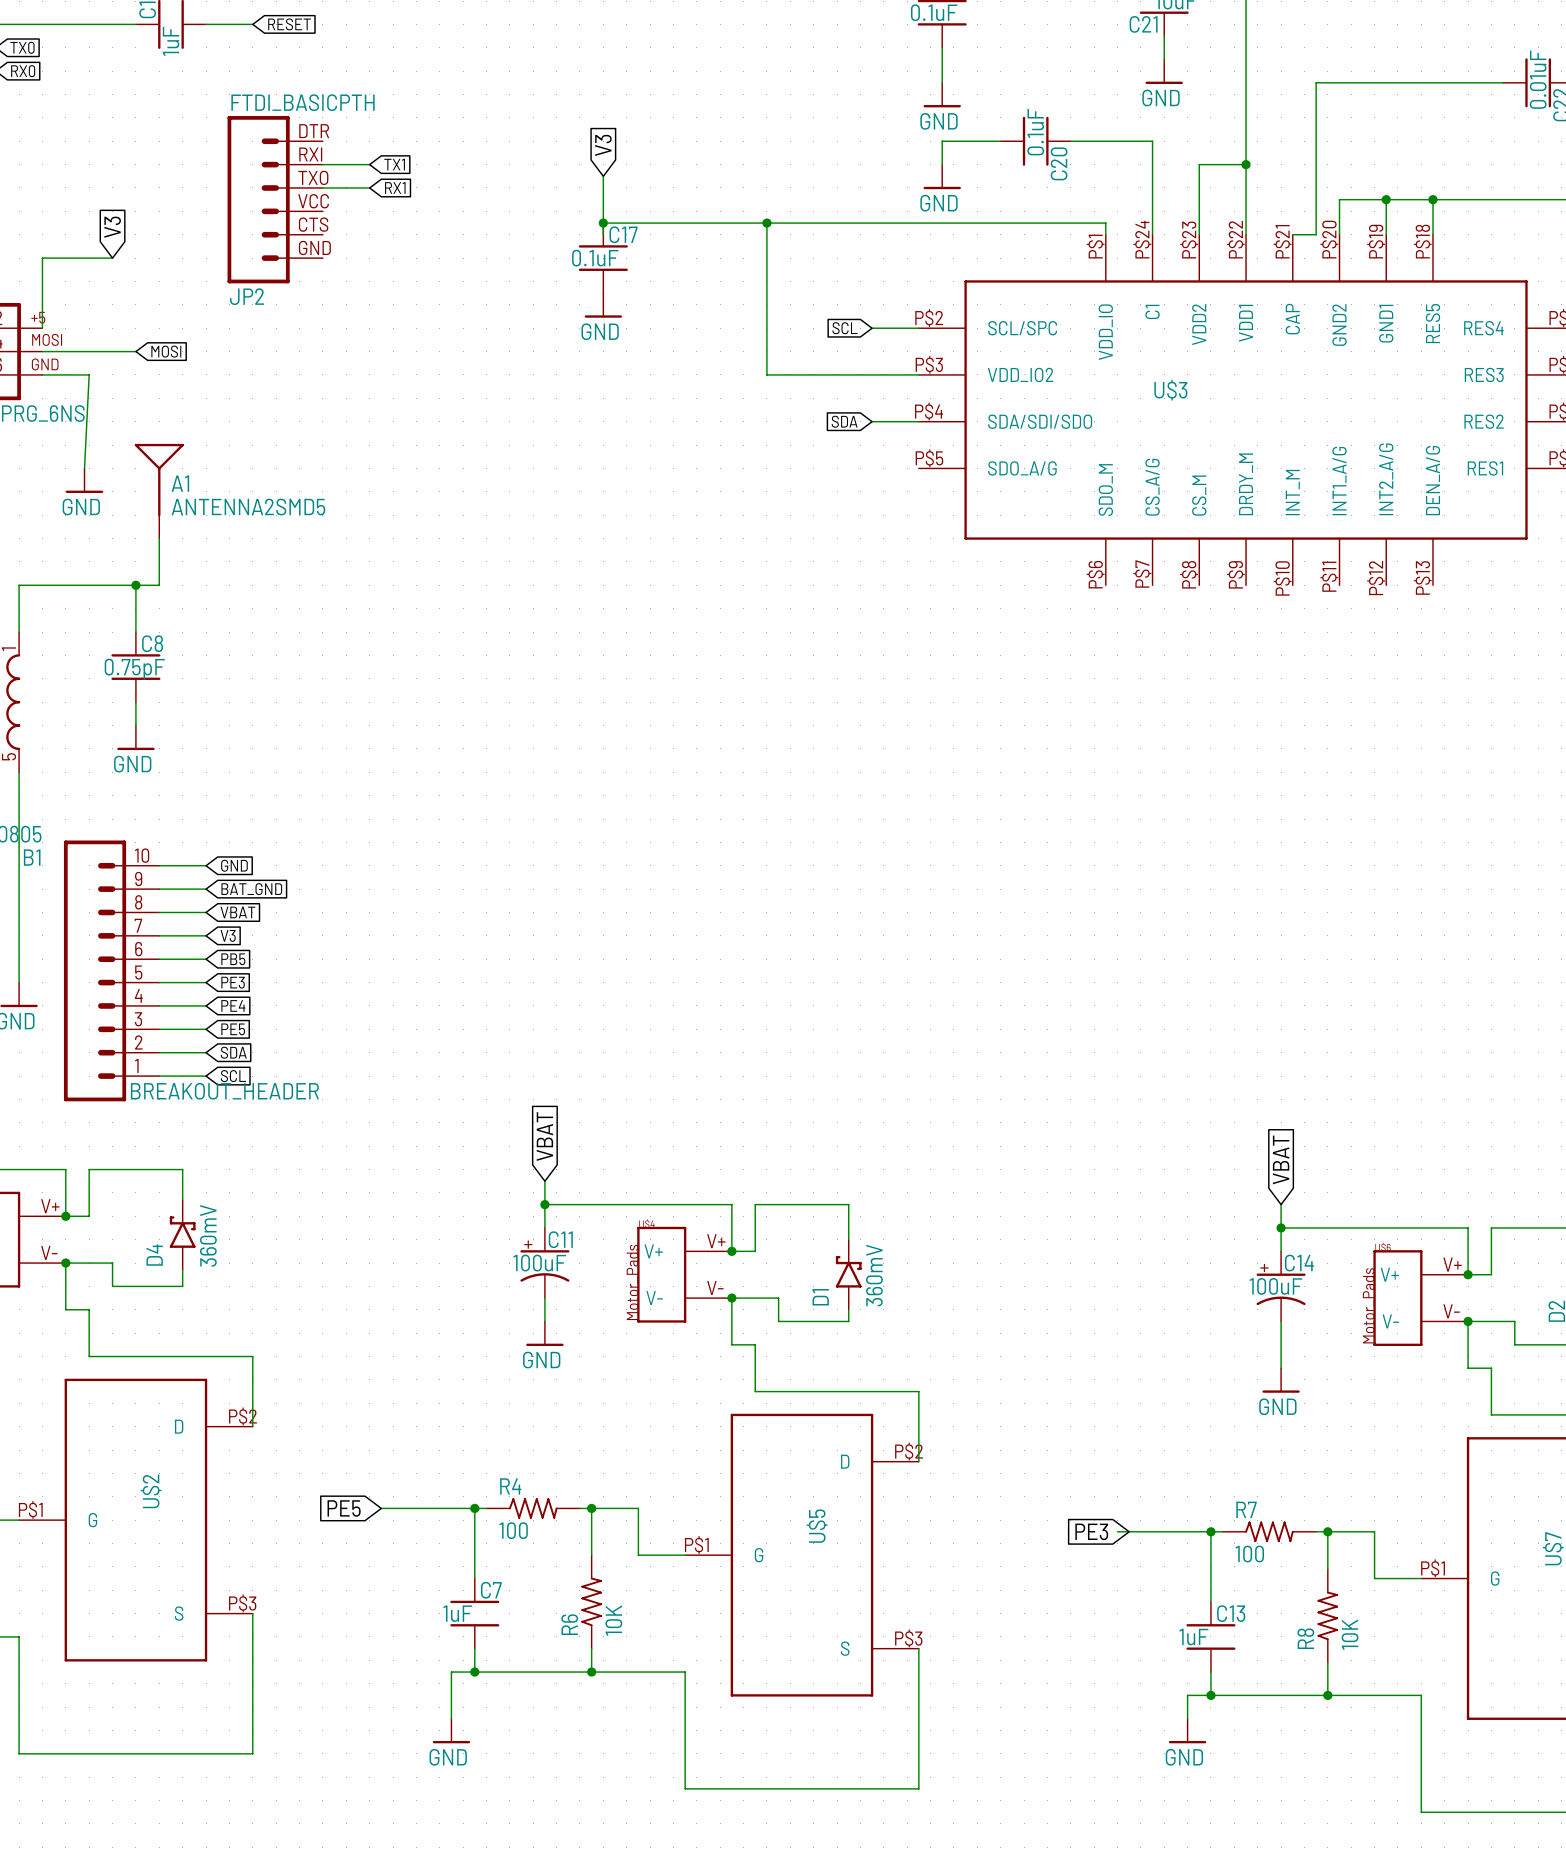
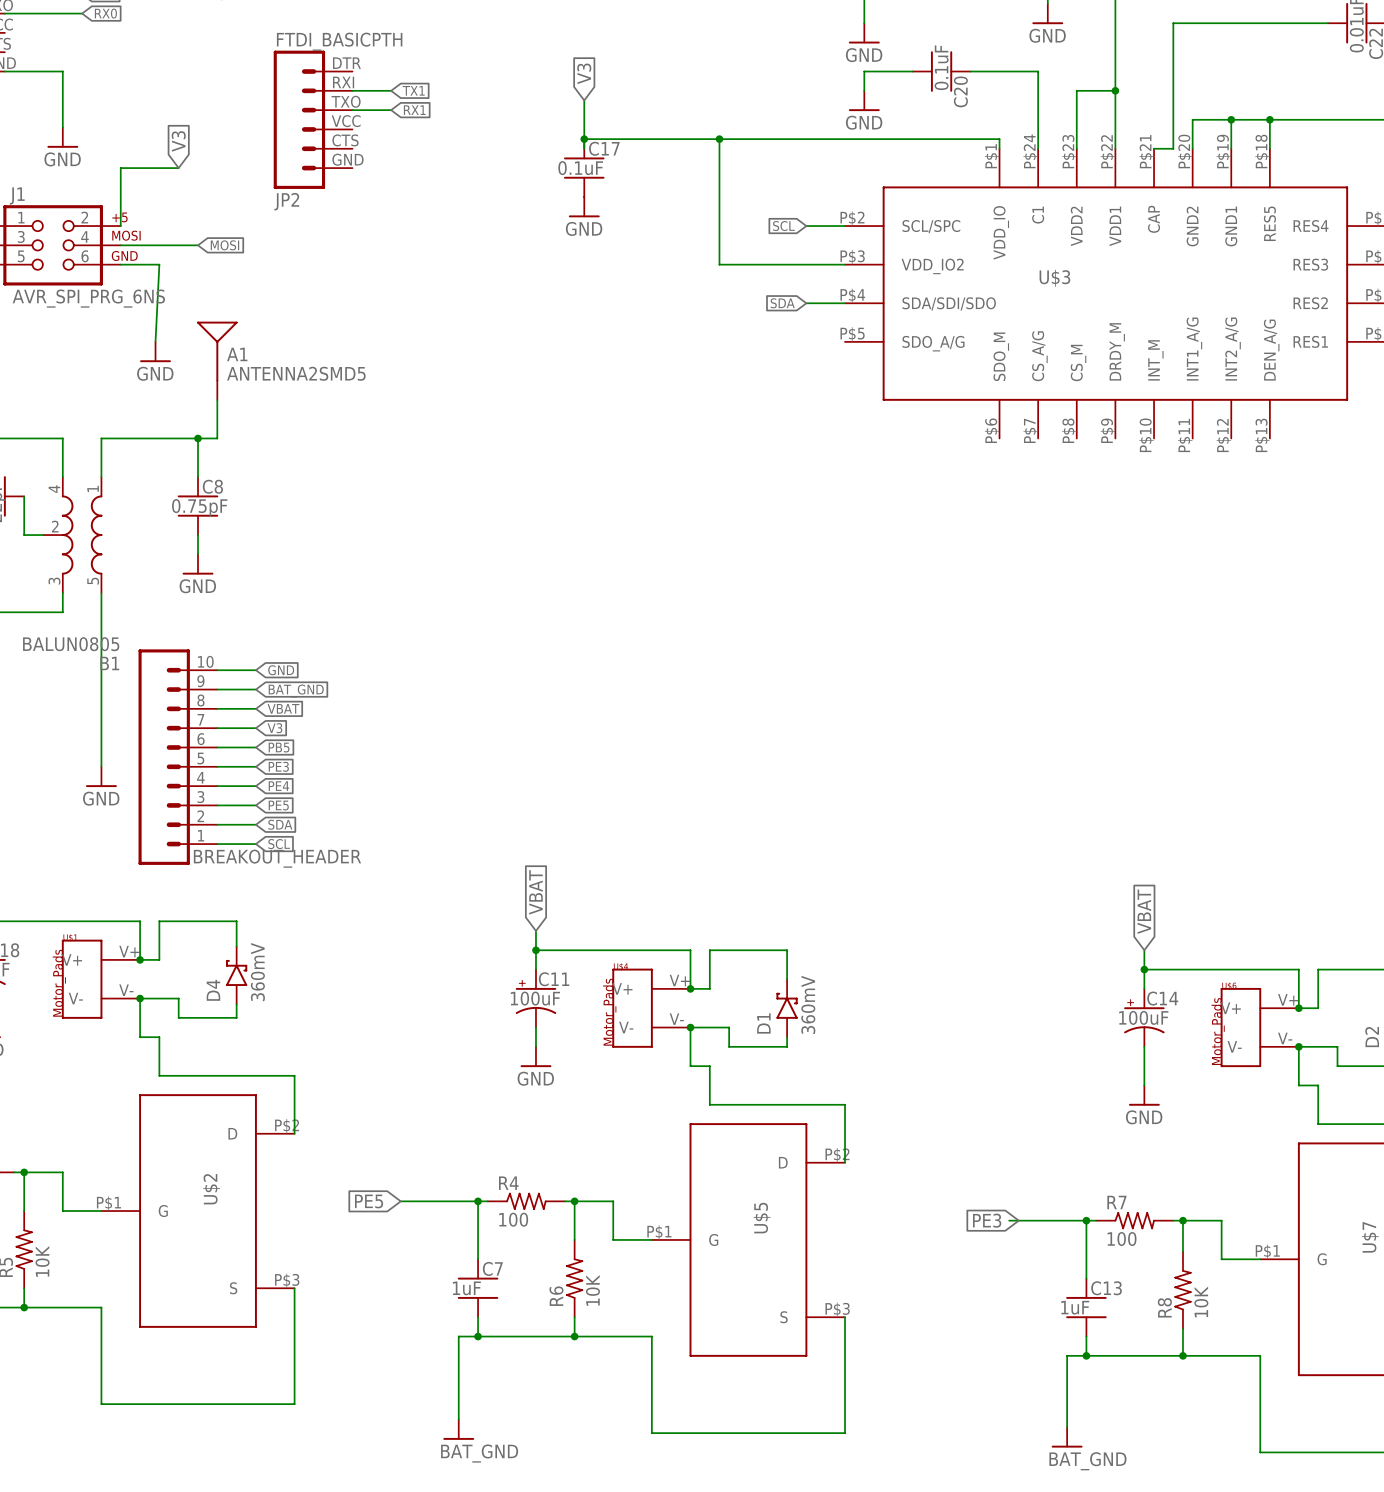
wire: none -> (1067, 1375) (1067, 1427)
power symbol: GND (451, 1731) -> none
power symbol: GND (1187, 1731) -> none
power symbol: none -> BAT_GND (458, 1429)
power symbol: none -> BAT_GND (1067, 1437)

